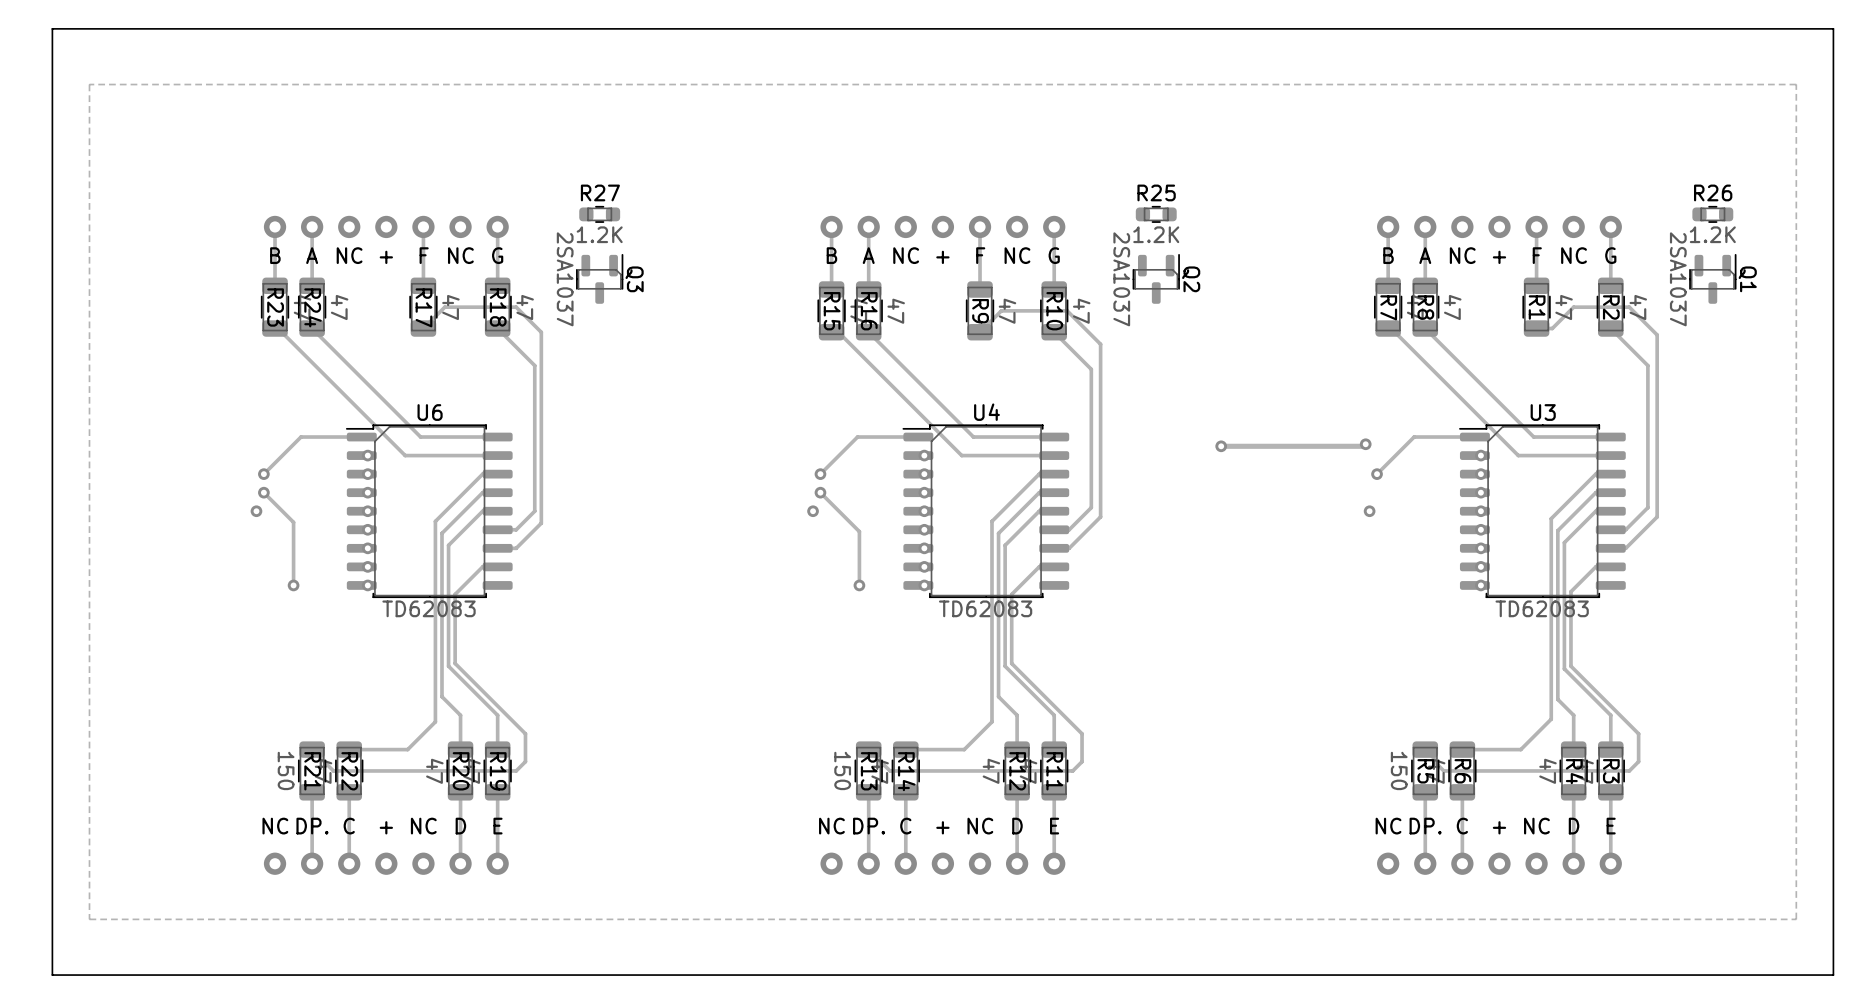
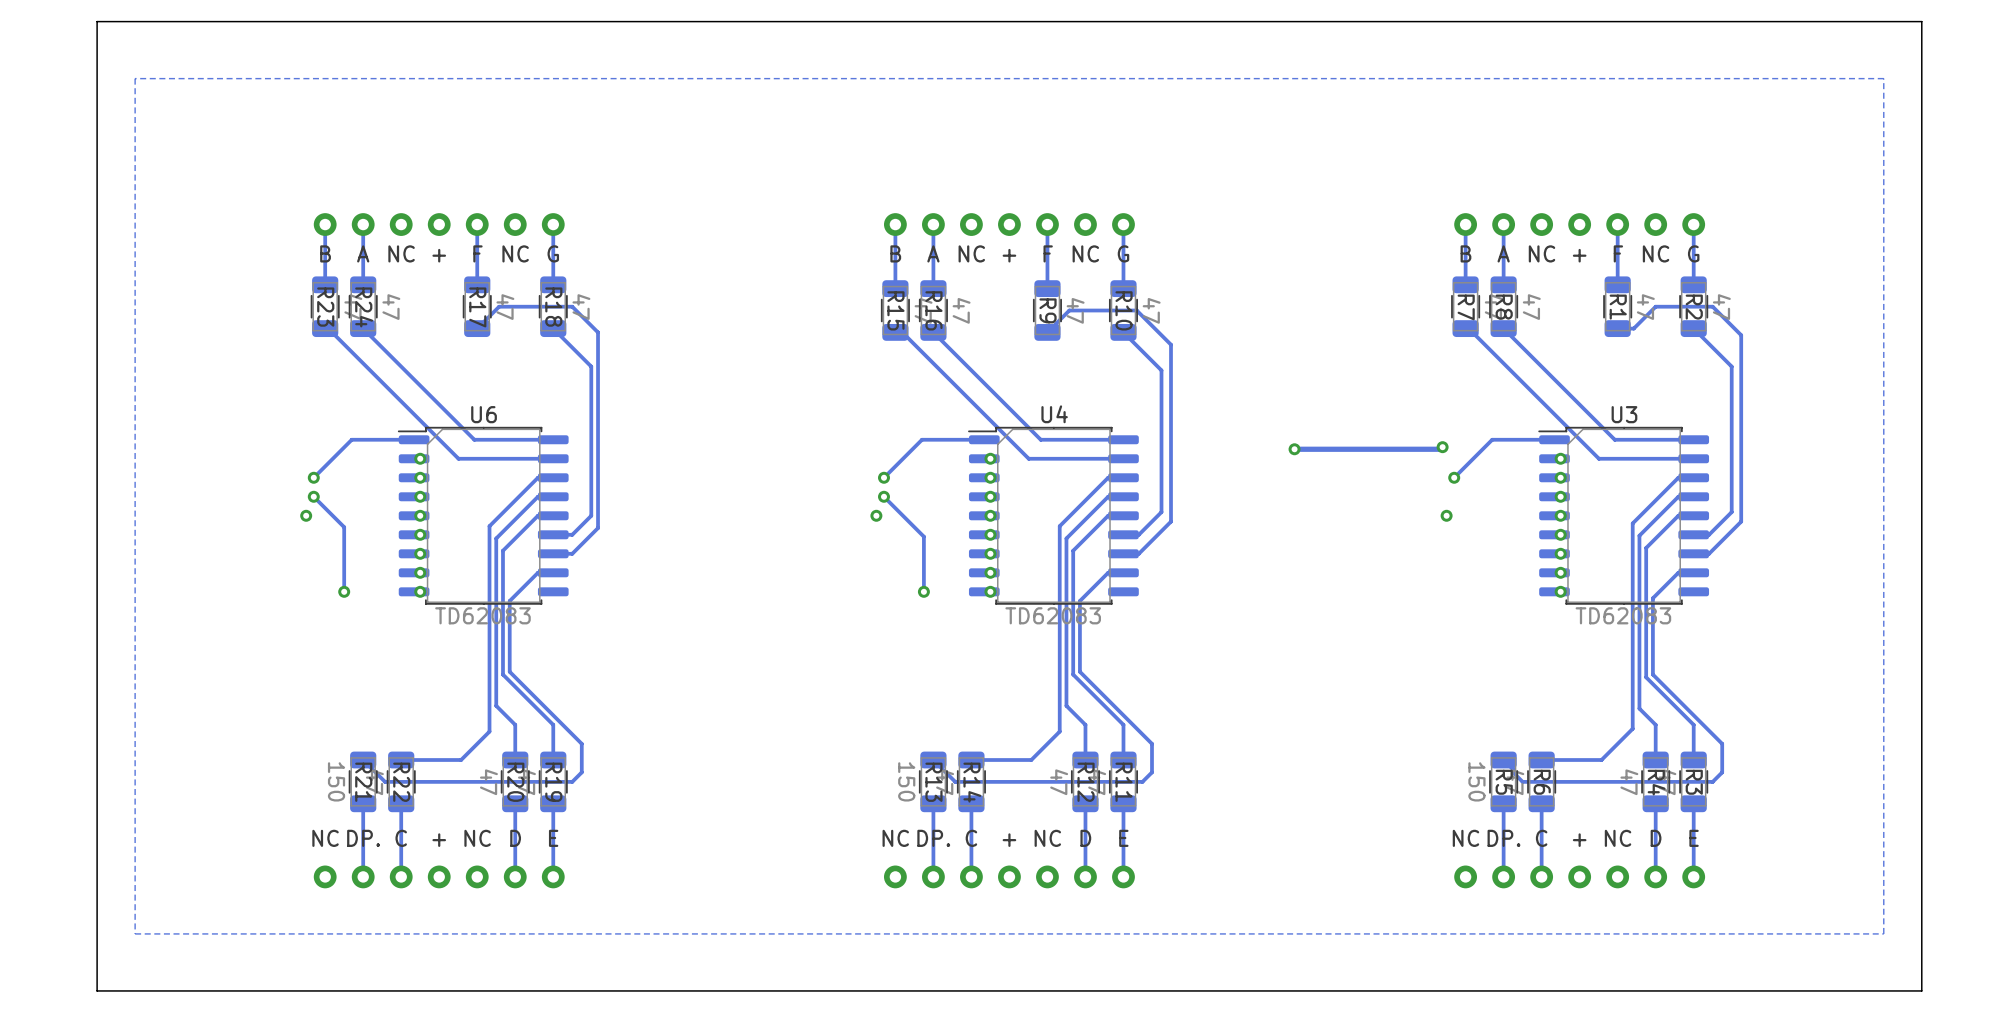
R27: 1.2K (599, 214) -> none
R25: 1.2K (1156, 214) -> none
R26: 1.2K (1712, 214) -> none
Q3: 2SA1037 (599, 278) -> none
Q2: 2SA1037 (1156, 278) -> none
Q1: 2SA1037 (1712, 278) -> none

